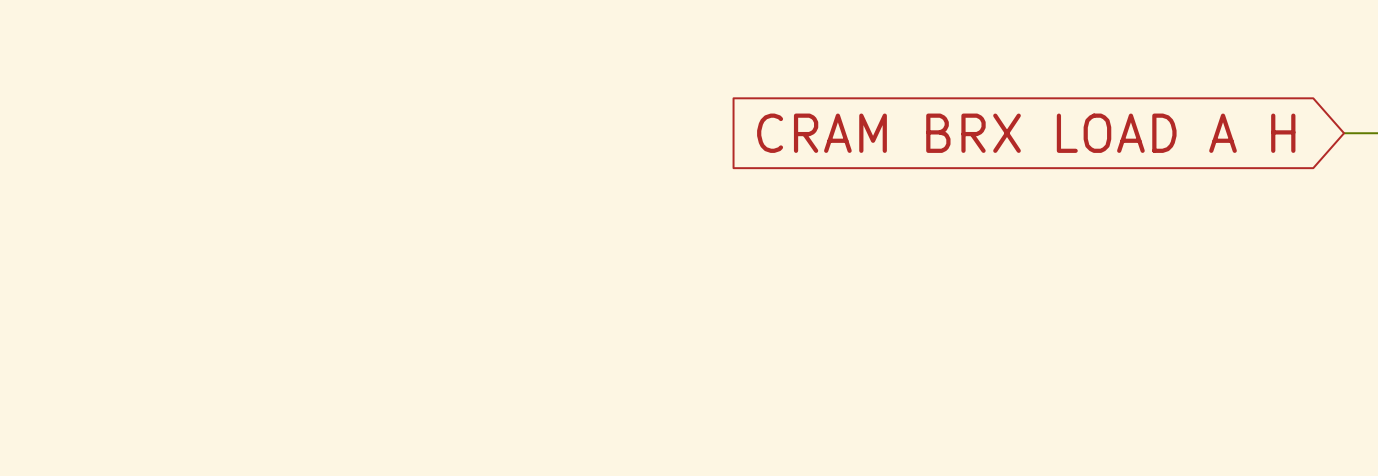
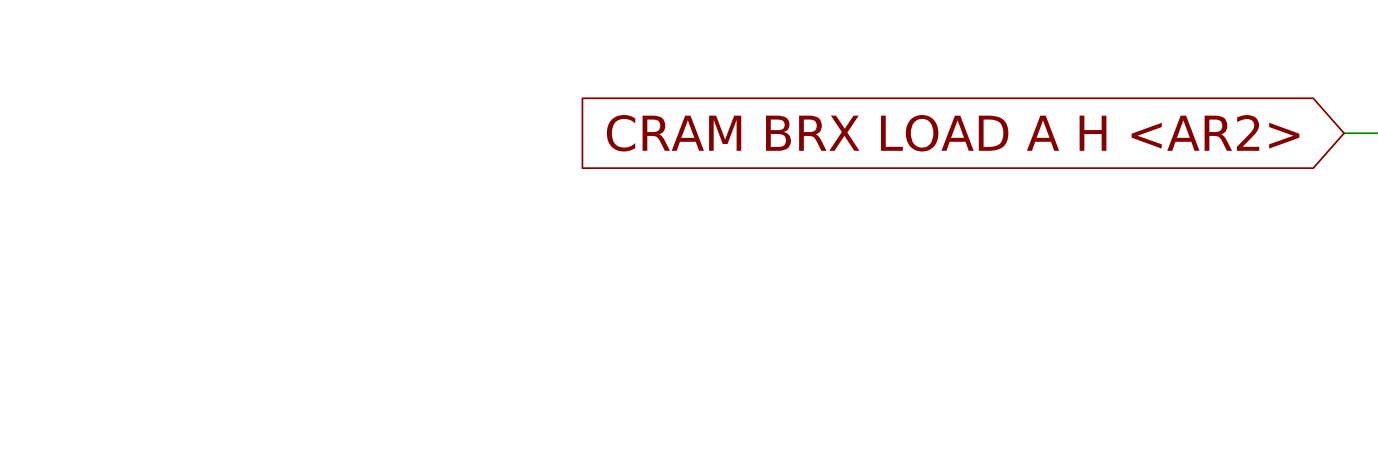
global label: CRAM BRX LOAD A H (1026, 133) -> CRAM BRX LOAD A H <AR2> (953, 133)

